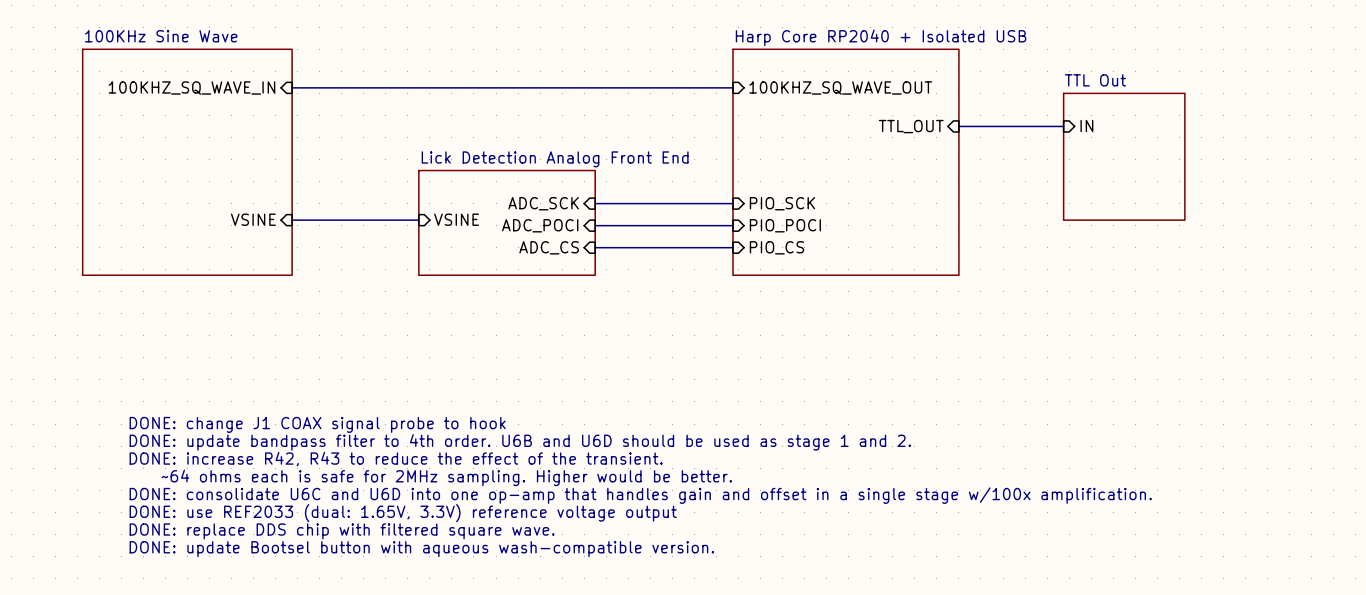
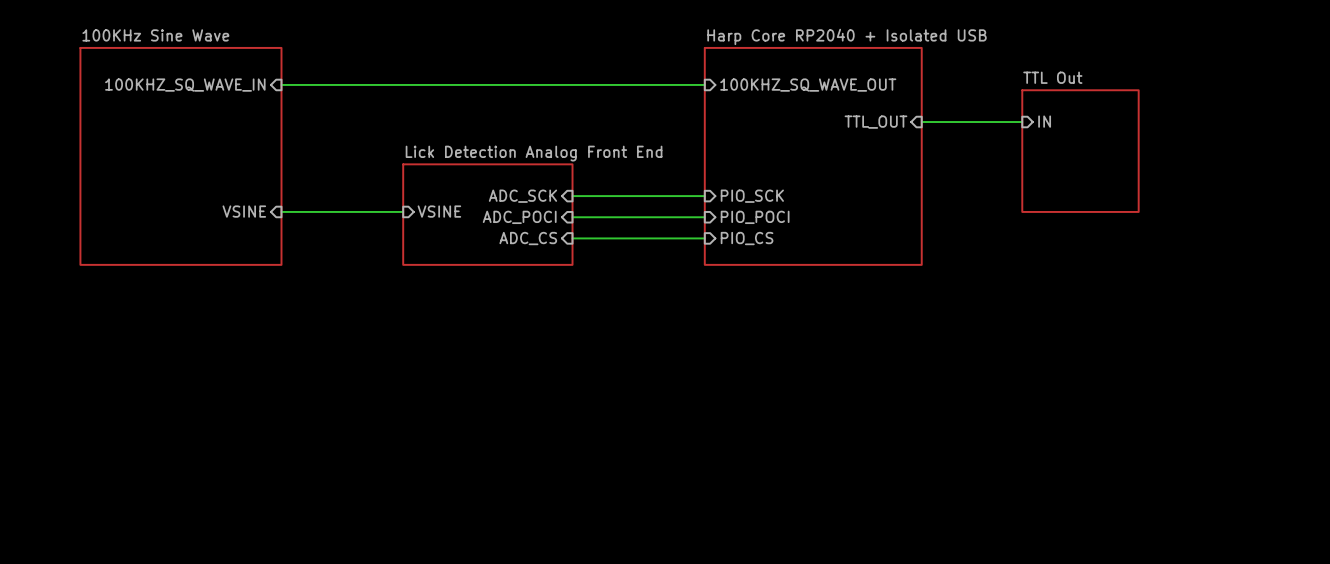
text: DONE: change J1 COAX signal probe to hook (317, 424) -> none
text: DONE: update bandpass filter to 4th order. U6B and U6D should be used as stage 1 and 2. (520, 442) -> none
text: DONE: increase R42, R43 to reduce the effect of the transient. (396, 459) -> none
text: ~64 ohms each is safe for 2MHz sampling. Higher would be better. (446, 477) -> none
text: DONE: consolidate U6C and U6D into one op-amp that handles gain and offset in a single stage w/100x amplification. (640, 495) -> none
text: DONE: use REF2033 (dual: 1.65V, 3.3V) reference voltage output (403, 513) -> none
text: DONE: replace DDS chip with filtered square wave. (342, 531) -> none
text: DONE: update Bootsel button with aqueous wash-compatible version. (421, 549) -> none

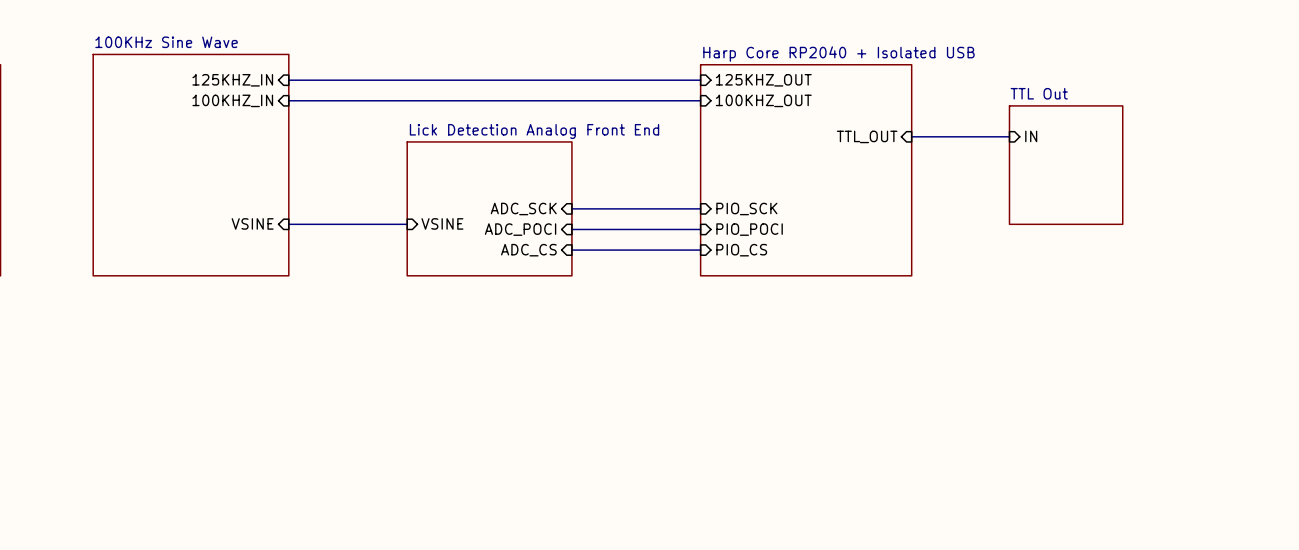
sheet 100KHz Sine Wave shape: [79, 47, 283, 266] -> [92, 53, 290, 277]
sheet pin: none -> 125KHZ_IN (232, 80)
wire: none -> (288, 80) (700, 80)
sheet pin: none -> 125KHZ_OUT (763, 80)
sheet pin: 100KHZ_SQ_WAVE_IN (185, 85) -> 100KHZ_IN (232, 100)
sheet pin: 100KHZ_SQ_WAVE_OUT (808, 85) -> 100KHZ_OUT (763, 100)
sheet Lick Detection Analog Front End: none -> (489, 208)
sheet Lick Detection Analog Front End: (487, 214) -> none

